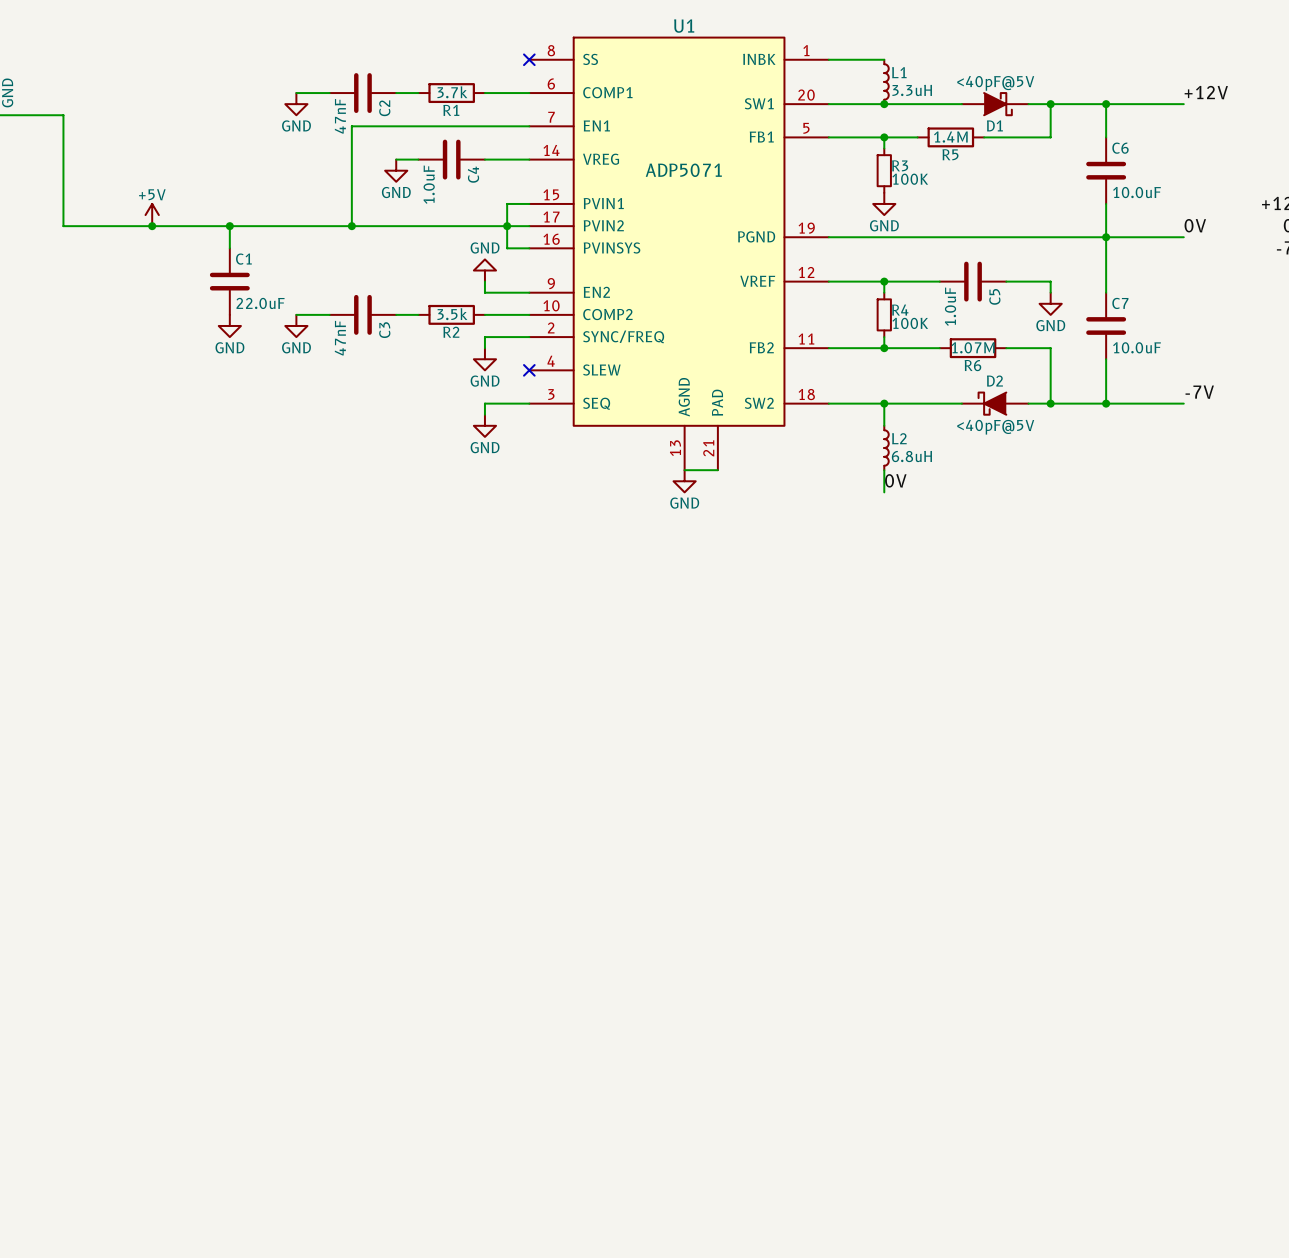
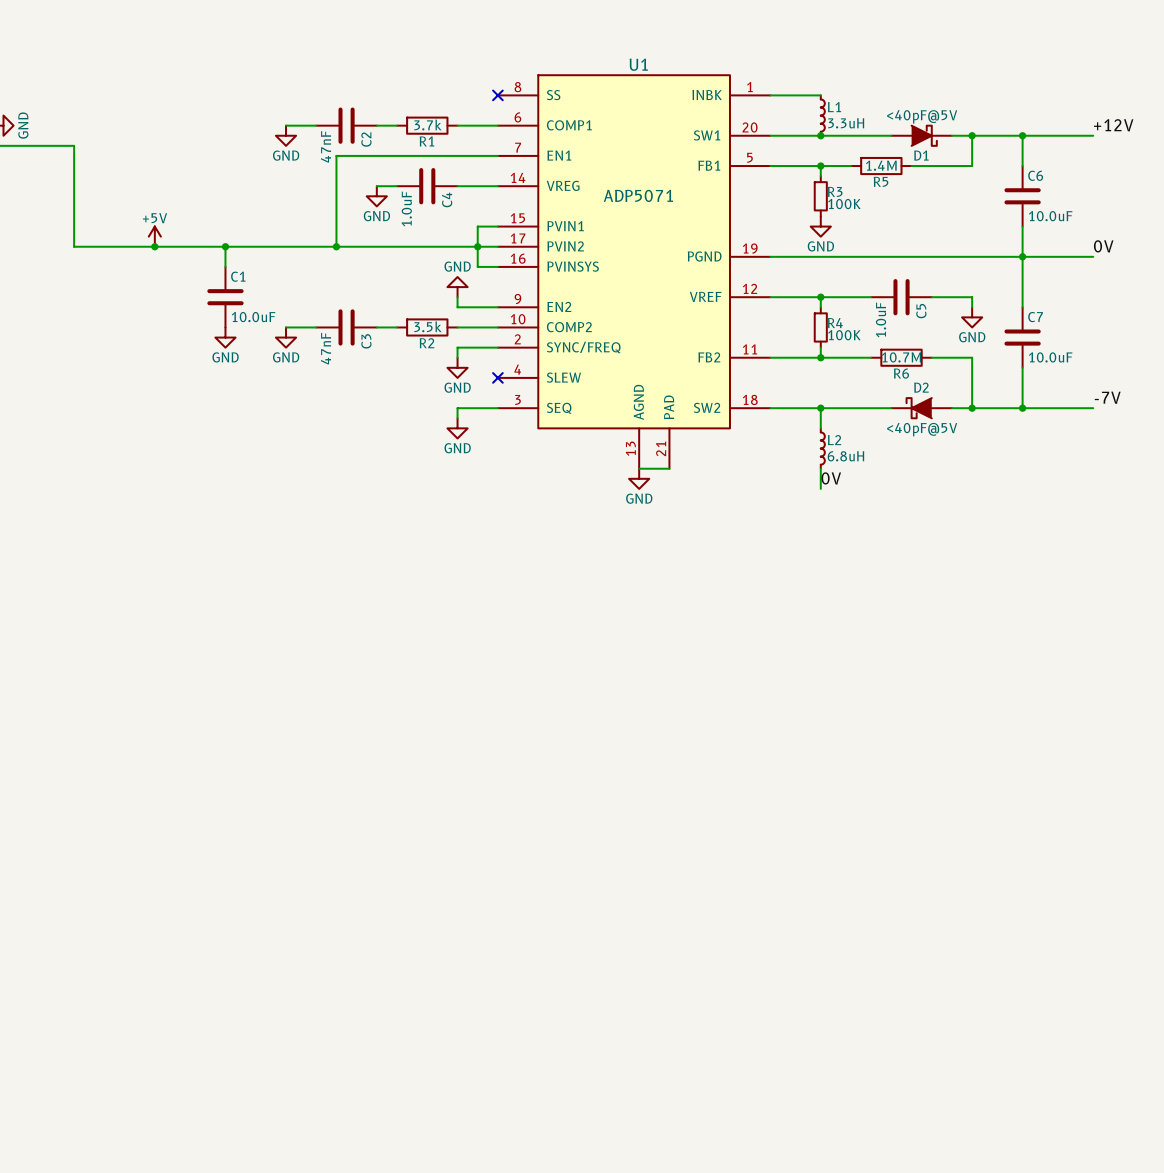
C1 value: 22.0uF (260, 303) -> 10.0uF (253, 317)
R6 value: 1.07M (973, 347) -> 10.7M (901, 357)

